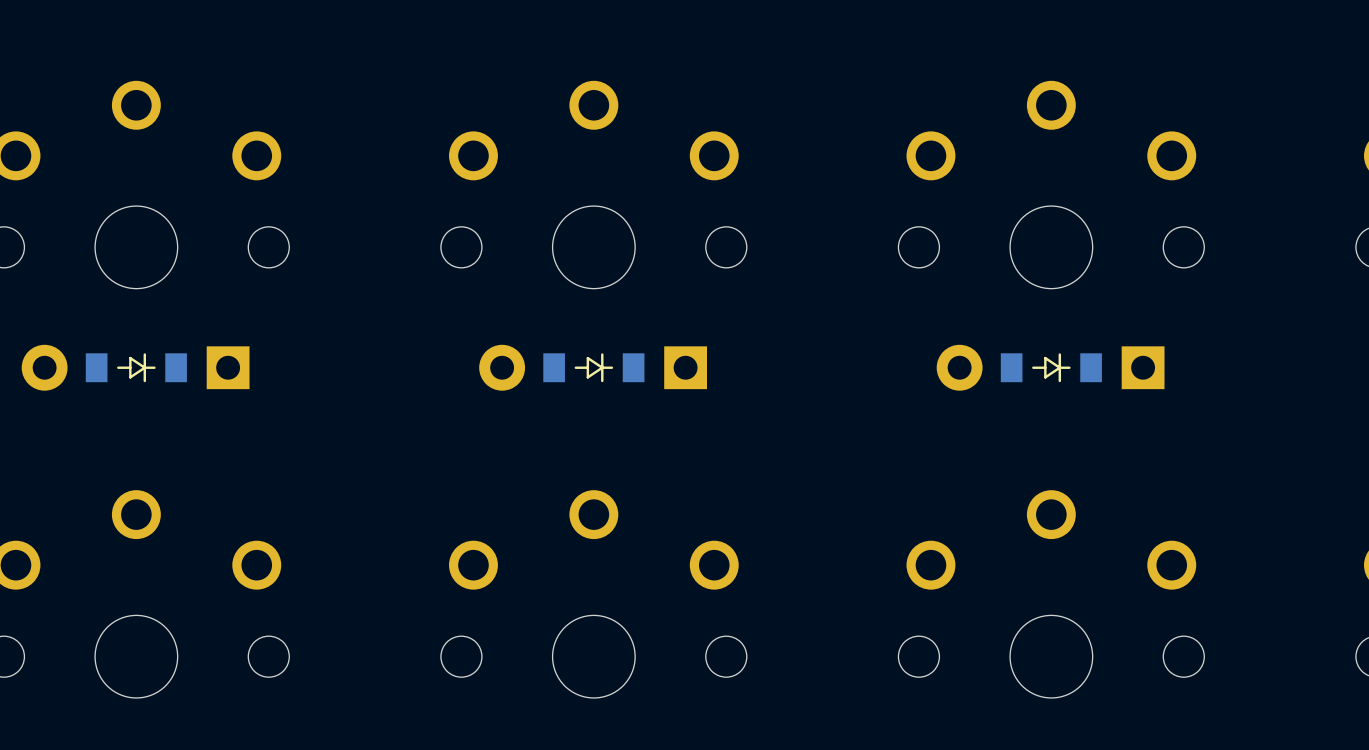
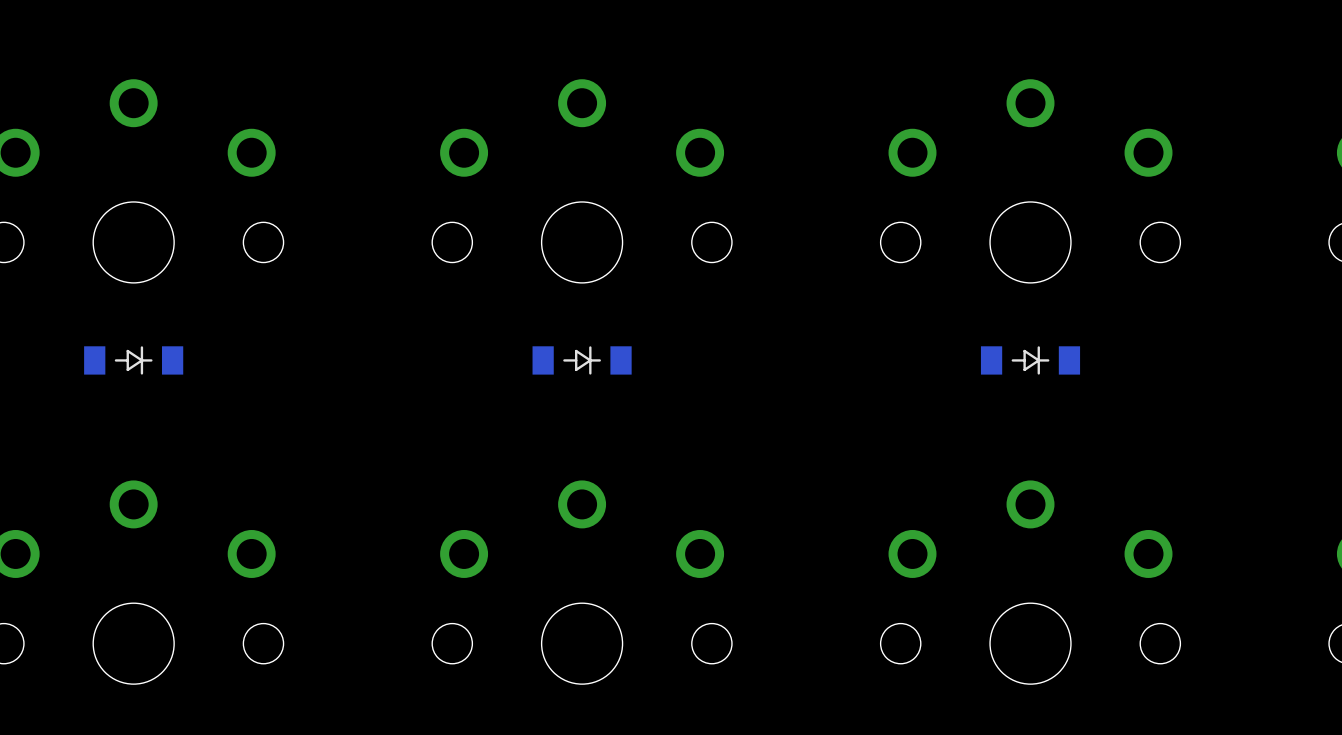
part footprint: [21, 344, 250, 391] -> [84, 346, 184, 375]
part footprint: [479, 344, 708, 391] -> [532, 346, 632, 375]
part footprint: [936, 344, 1165, 391] -> [980, 346, 1081, 375]

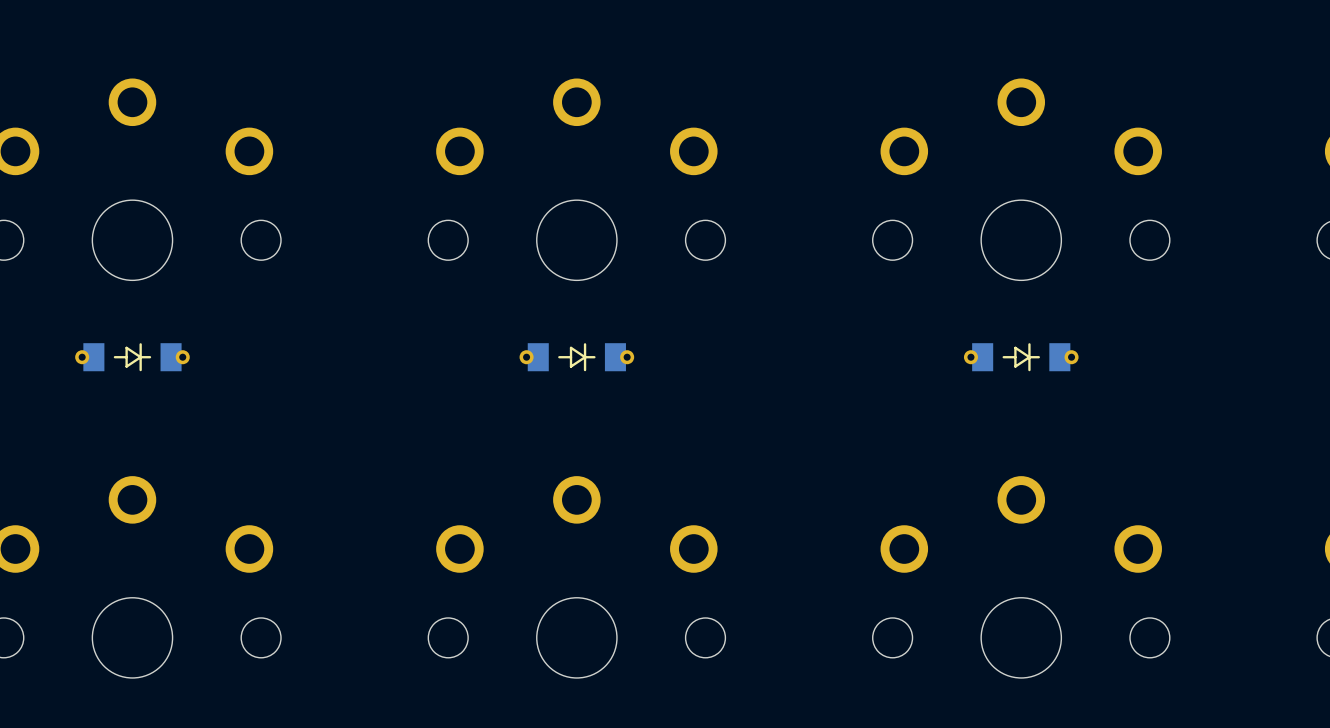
part: none -> (82, 357)
part: none -> (182, 357)
part: none -> (526, 357)
part: none -> (627, 357)
part: none -> (970, 357)
part: none -> (1071, 357)

